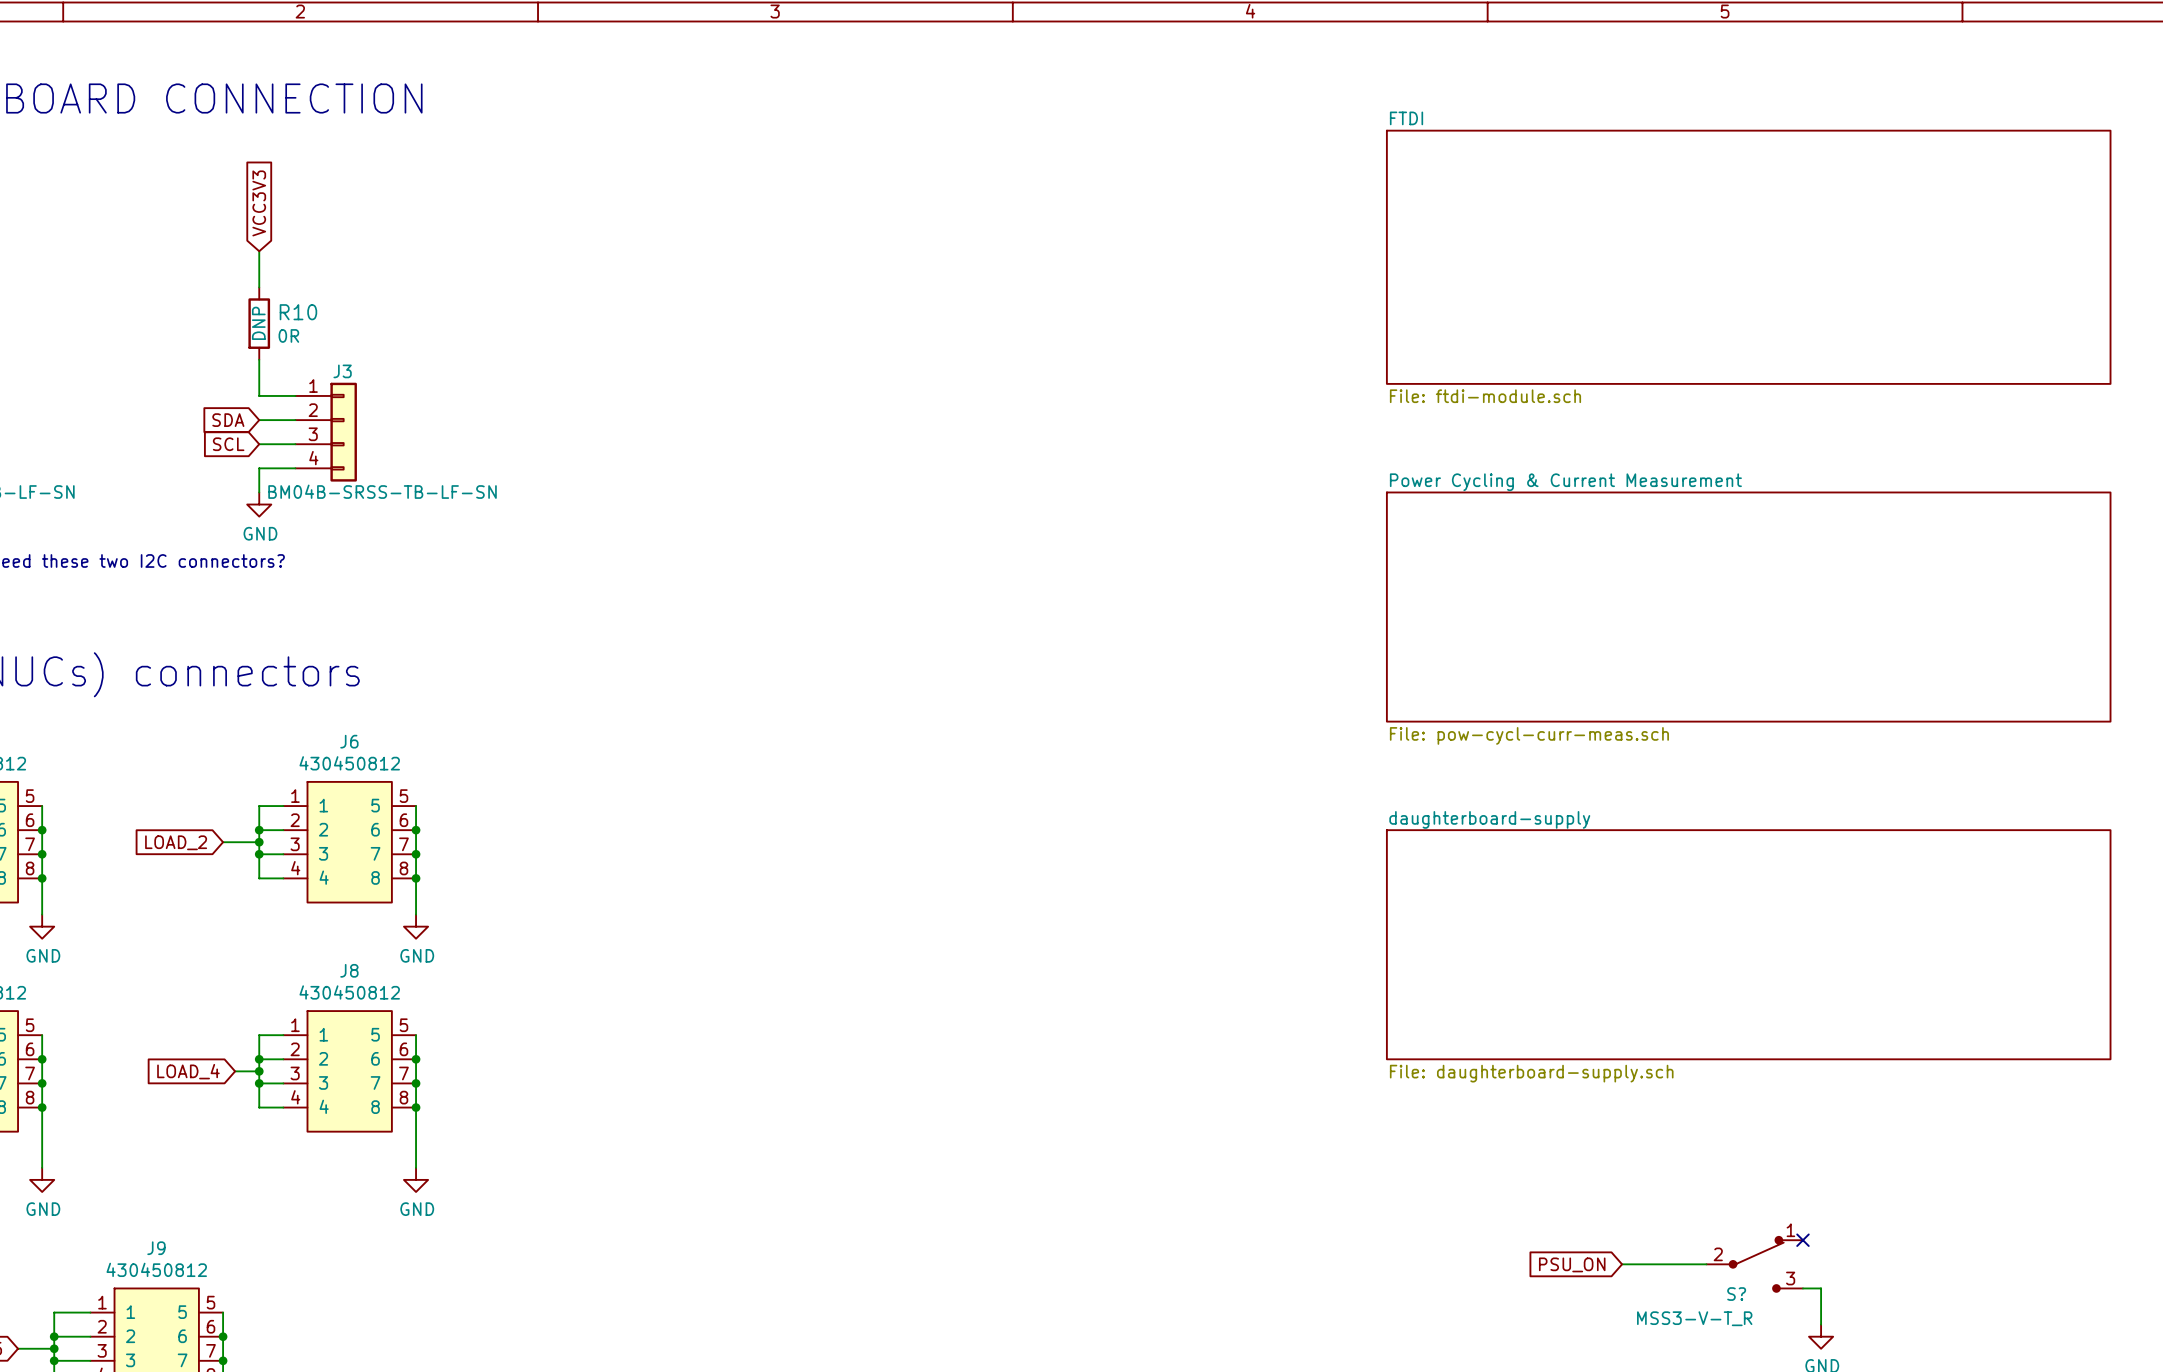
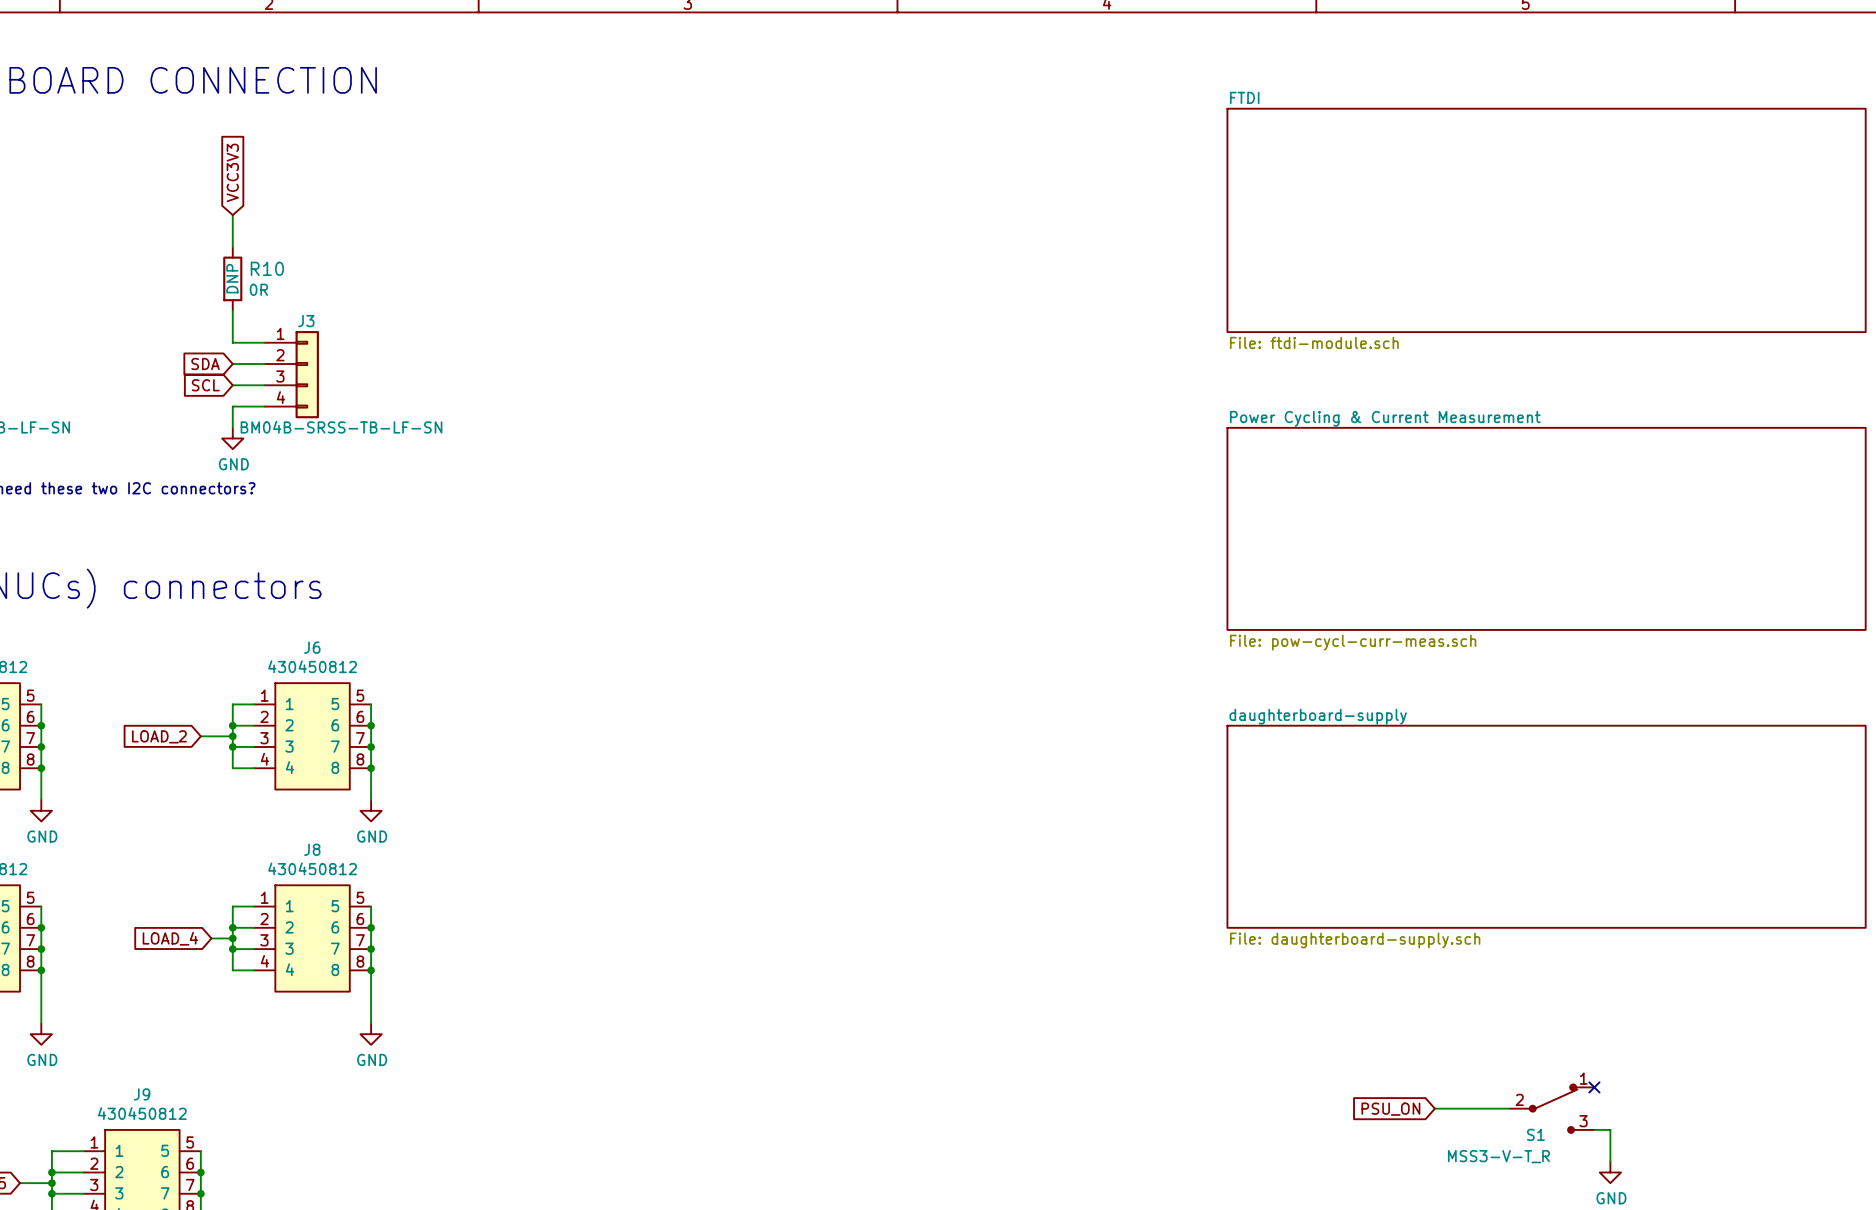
S? name: S? (1736, 1294) -> S1 (1535, 1134)

